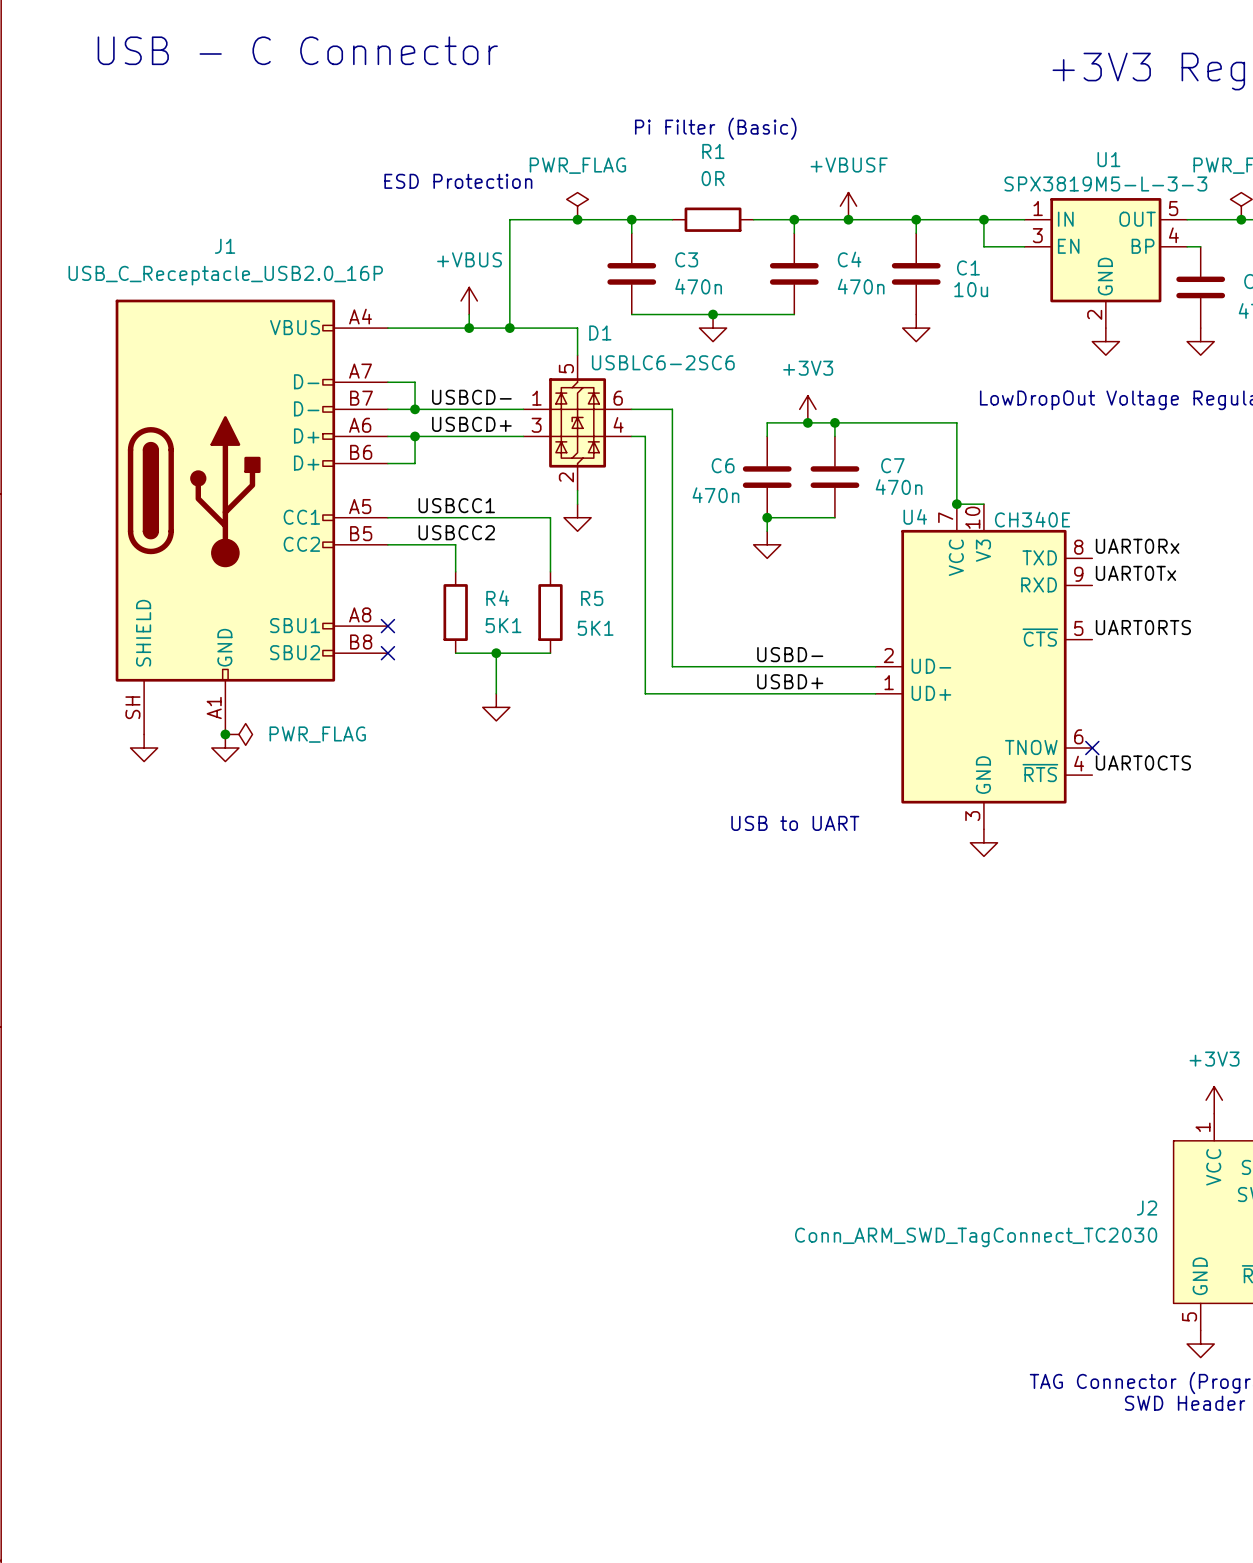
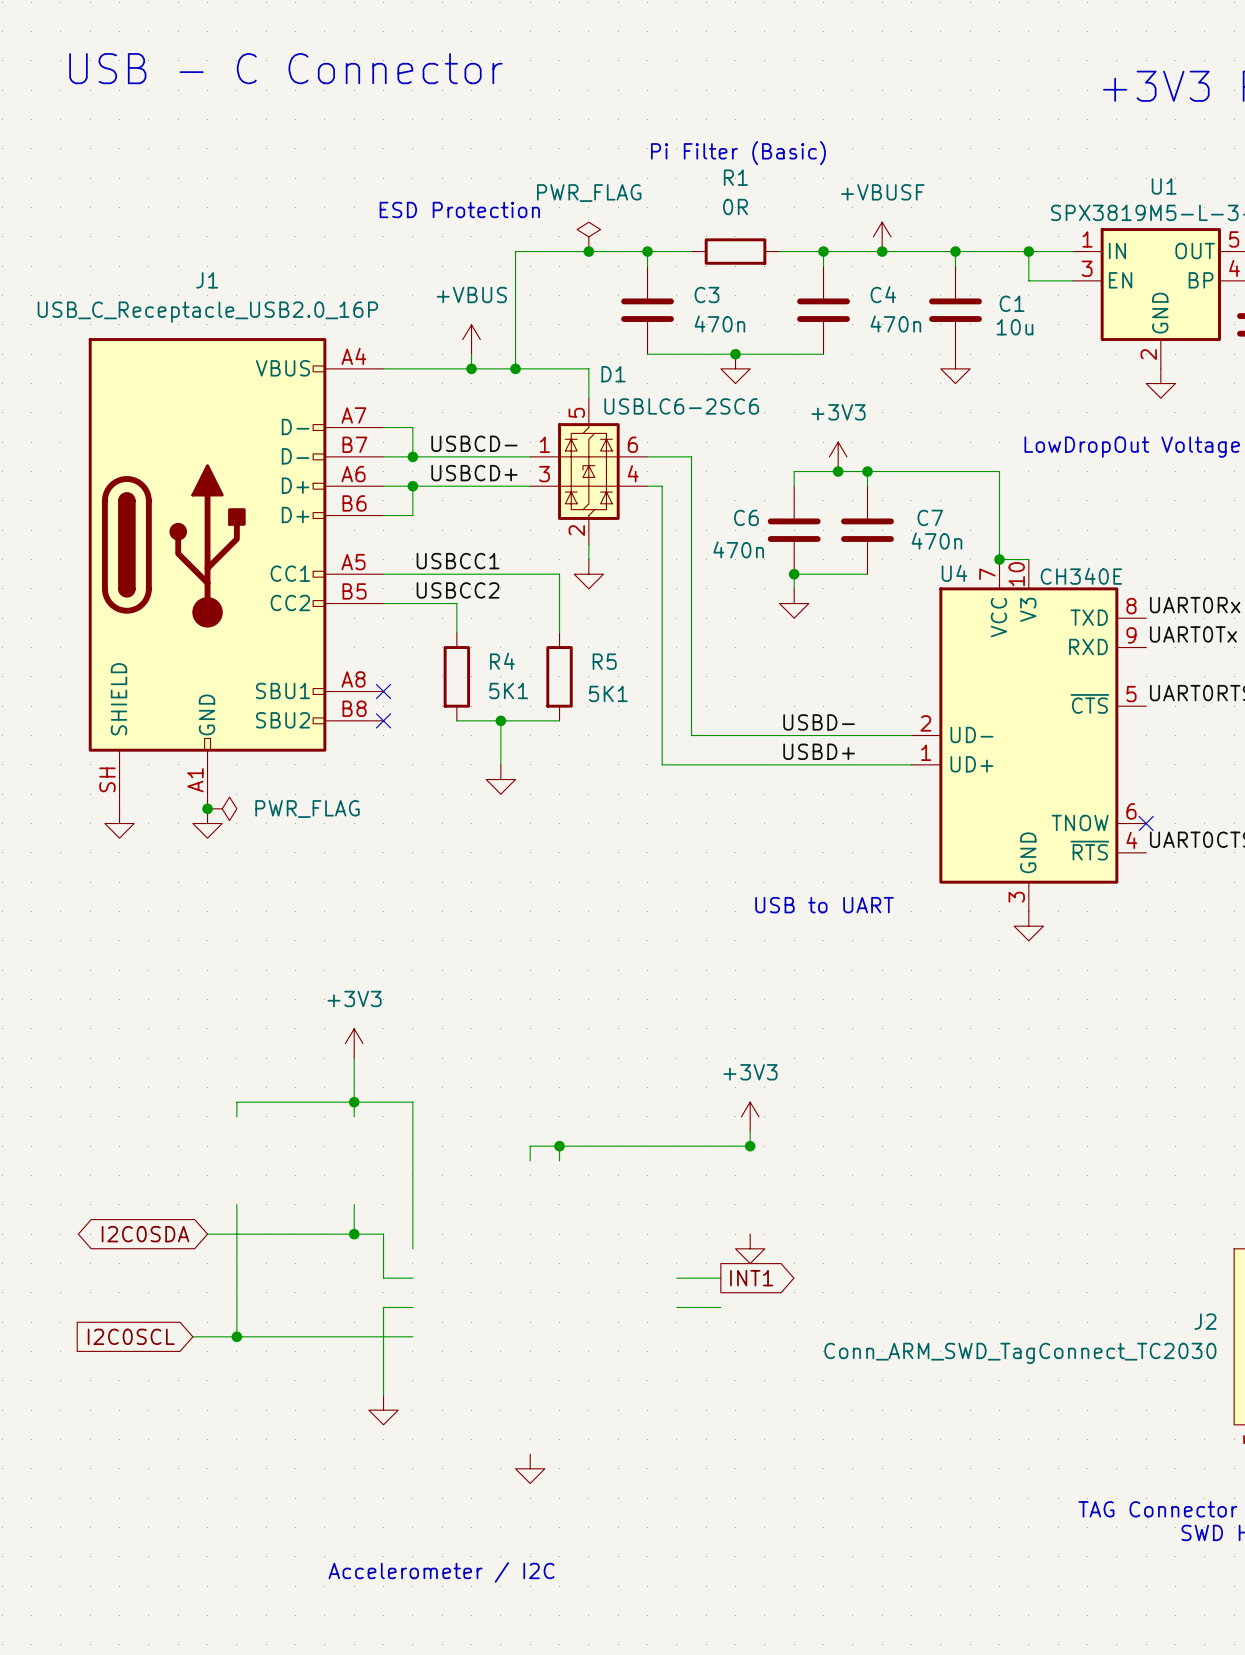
power symbol: none -> +3V3 (354, 1043)
wire: none -> (354, 1058) (354, 1116)
junction: none -> (354, 1102)
wire: none -> (236, 1116) (236, 1102) (412, 1102) (412, 1248)
power symbol: none -> +3V3 (750, 1116)
wire: none -> (750, 1131) (750, 1146) (530, 1146) (530, 1160)
wire: none -> (559, 1146) (559, 1160)
junction: none -> (559, 1146)
junction: none -> (750, 1146)
wire: none -> (236, 1204) (236, 1336)
wire: none -> (354, 1204) (354, 1234)
global label: none -> I2C0SDA (145, 1234)
wire: none -> (207, 1234) (383, 1234) (383, 1278) (412, 1278)
junction: none -> (354, 1234)
power symbol: none -> (750, 1248)
wire: none -> (676, 1278) (720, 1278)
global label: none -> INT1 (751, 1278)
wire: none -> (412, 1307) (383, 1307) (383, 1395)
wire: none -> (676, 1307) (720, 1307)
global label: none -> I2C0SCL (131, 1336)
wire: none -> (192, 1336) (412, 1336)
junction: none -> (236, 1336)
power symbol: none -> (383, 1410)
power symbol: none -> (530, 1468)
text: none -> Accelerometer / I2C (441, 1572)

